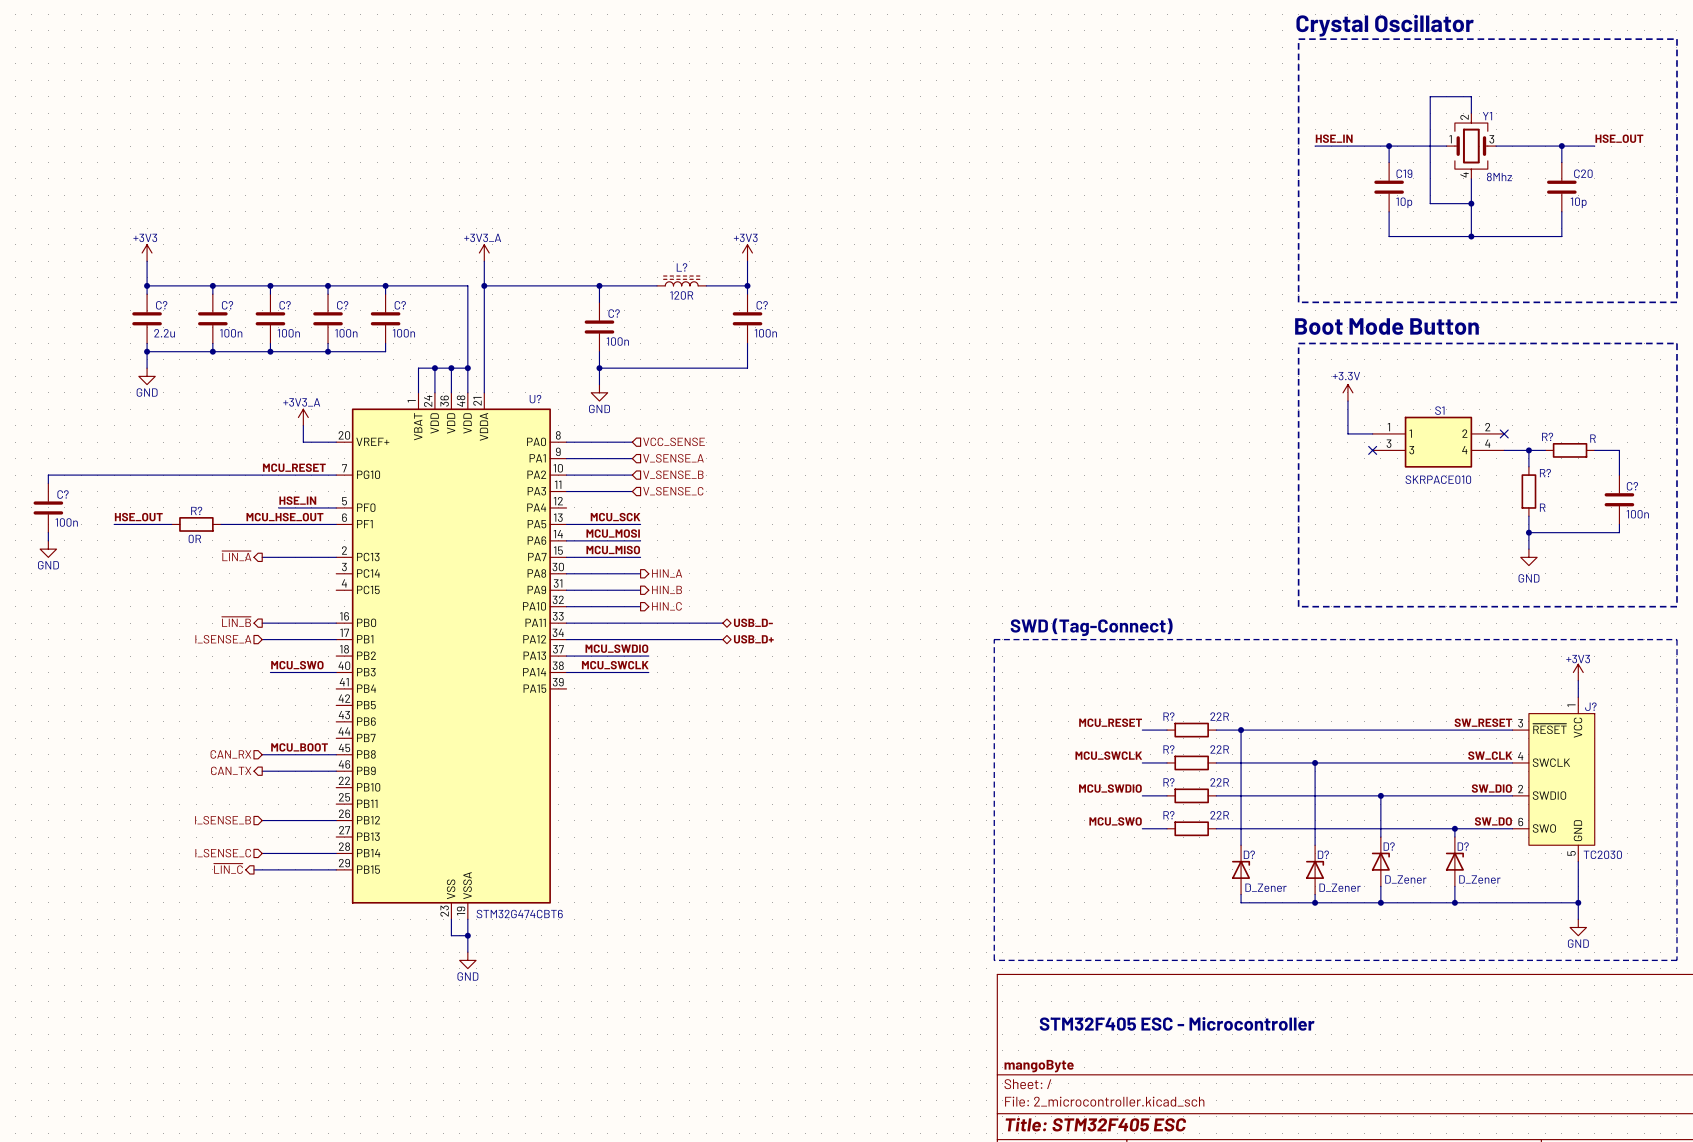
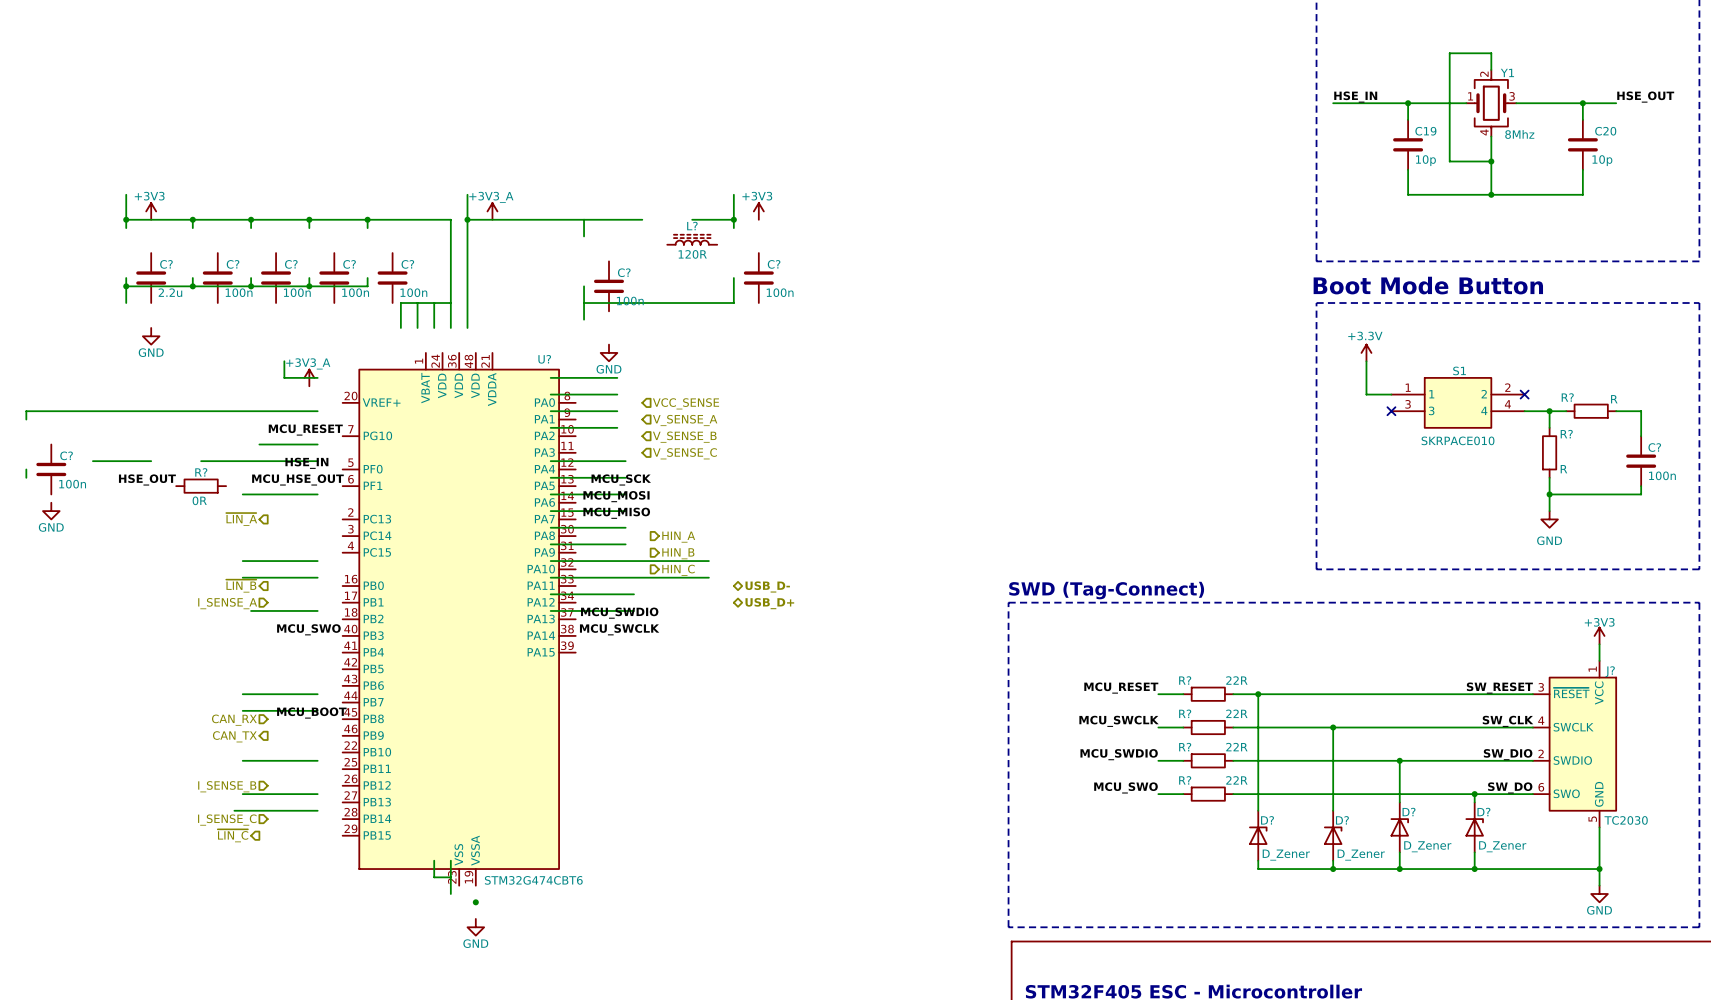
junction: none -> (126, 219)
wire: (147, 261) (147, 294) -> (126, 194) (126, 228)
junction: none -> (192, 219)
junction: none -> (251, 219)
junction: none -> (309, 219)
junction: none -> (367, 219)
wire: (484, 261) (484, 392) -> (467, 194) (467, 327)
wire: (747, 261) (747, 294) -> (733, 194) (733, 228)
wire: (147, 285) (467, 285) (467, 392) -> (126, 219) (450, 219) (450, 327)
junction: (147, 285) -> none
wire: (212, 285) (212, 294) -> (192, 219) (192, 228)
junction: (212, 285) -> none
wire: (270, 285) (270, 294) -> (251, 219) (251, 228)
junction: (270, 285) -> none
wire: (328, 285) (328, 294) -> (309, 219) (309, 228)
junction: (328, 285) -> none
wire: (385, 285) (385, 294) -> (367, 219) (367, 228)
junction: (385, 285) -> none
wire: (484, 285) (657, 285) -> (467, 219) (642, 219)
junction position: (484, 285) -> (467, 219)
wire: (599, 285) (599, 302) -> (584, 219) (584, 236)
junction: (599, 285) -> none
wire: (706, 285) (747, 285) -> (692, 219) (733, 219)
junction position: (747, 285) -> (733, 219)
junction: none -> (126, 286)
junction: none -> (192, 286)
junction: none -> (251, 286)
junction: none -> (309, 286)
wire: (147, 343) (147, 368) -> (126, 278) (126, 303)
wire: (212, 343) (212, 351) -> (192, 278) (192, 286)
wire: (270, 343) (270, 351) -> (251, 278) (251, 286)
wire: (328, 343) (328, 351) -> (309, 278) (309, 286)
wire: (385, 343) (385, 351) (147, 351) -> (367, 278) (367, 286) (126, 286)
wire: (747, 343) (747, 368) (599, 368) -> (733, 278) (733, 303) (584, 303)
junction: (147, 351) -> none
junction: (212, 351) -> none
junction: (270, 351) -> none
junction: (328, 351) -> none
wire: (599, 351) (599, 384) -> (584, 286) (584, 319)
wire: (434, 368) (434, 392) -> (417, 303) (417, 327)
junction: (434, 368) -> none
wire: (451, 368) (451, 392) -> (434, 303) (434, 327)
junction: (451, 368) -> none
wire: (467, 368) (418, 368) (418, 392) -> (450, 303) (400, 303) (400, 327)
junction: (467, 368) -> none
junction: (599, 368) -> none
wire: (303, 425) (303, 442) (336, 442) -> (284, 361) (284, 377) (317, 377)
wire: (566, 442) (632, 442) -> (550, 377) (617, 377)
wire: (566, 458) (632, 458) -> (550, 394) (617, 394)
wire: (336, 475) (48, 475) (48, 483) -> (317, 411) (26, 411) (26, 419)
wire: (566, 475) (632, 475) -> (550, 411) (617, 411)
wire: (566, 491) (632, 491) -> (550, 427) (617, 427)
wire: (278, 507) (336, 507) -> (259, 444) (317, 444)
wire: (114, 524) (171, 524) -> (92, 461) (151, 461)
wire: (221, 524) (336, 524) -> (201, 461) (317, 461)
wire: (566, 524) (640, 524) -> (550, 461) (625, 461)
wire: (48, 532) (48, 540) -> (26, 469) (26, 477)
wire: (566, 540) (640, 540) -> (550, 477) (625, 477)
wire: (262, 557) (336, 557) -> (242, 494) (317, 494)
wire: (566, 557) (640, 557) -> (550, 494) (625, 494)
wire: (566, 573) (640, 573) -> (550, 511) (625, 511)
wire: (566, 590) (640, 590) -> (550, 527) (625, 527)
wire: (566, 606) (640, 606) -> (550, 544) (625, 544)
wire: (262, 623) (336, 623) -> (242, 561) (317, 561)
wire: (566, 623) (722, 623) -> (550, 561) (708, 561)
wire: (262, 639) (336, 639) -> (242, 577) (317, 577)
wire: (566, 639) (722, 639) -> (550, 577) (708, 577)
wire: (566, 656) (648, 656) -> (550, 594) (633, 594)
wire: (270, 672) (336, 672) -> (251, 610) (317, 610)
wire: (566, 672) (648, 672) -> (550, 610) (633, 610)
wire: (262, 754) (336, 754) -> (242, 694) (317, 694)
wire: (262, 771) (336, 771) -> (242, 710) (317, 710)
wire: (262, 820) (336, 820) -> (242, 760) (317, 760)
wire: (262, 853) (336, 853) -> (242, 794) (317, 794)
wire: (253, 869) (336, 869) -> (234, 810) (317, 810)
wire: (451, 919) (451, 935) (467, 935) -> (434, 860) (434, 877) (450, 877)
wire: (467, 919) (467, 952) -> (450, 860) (450, 893)

